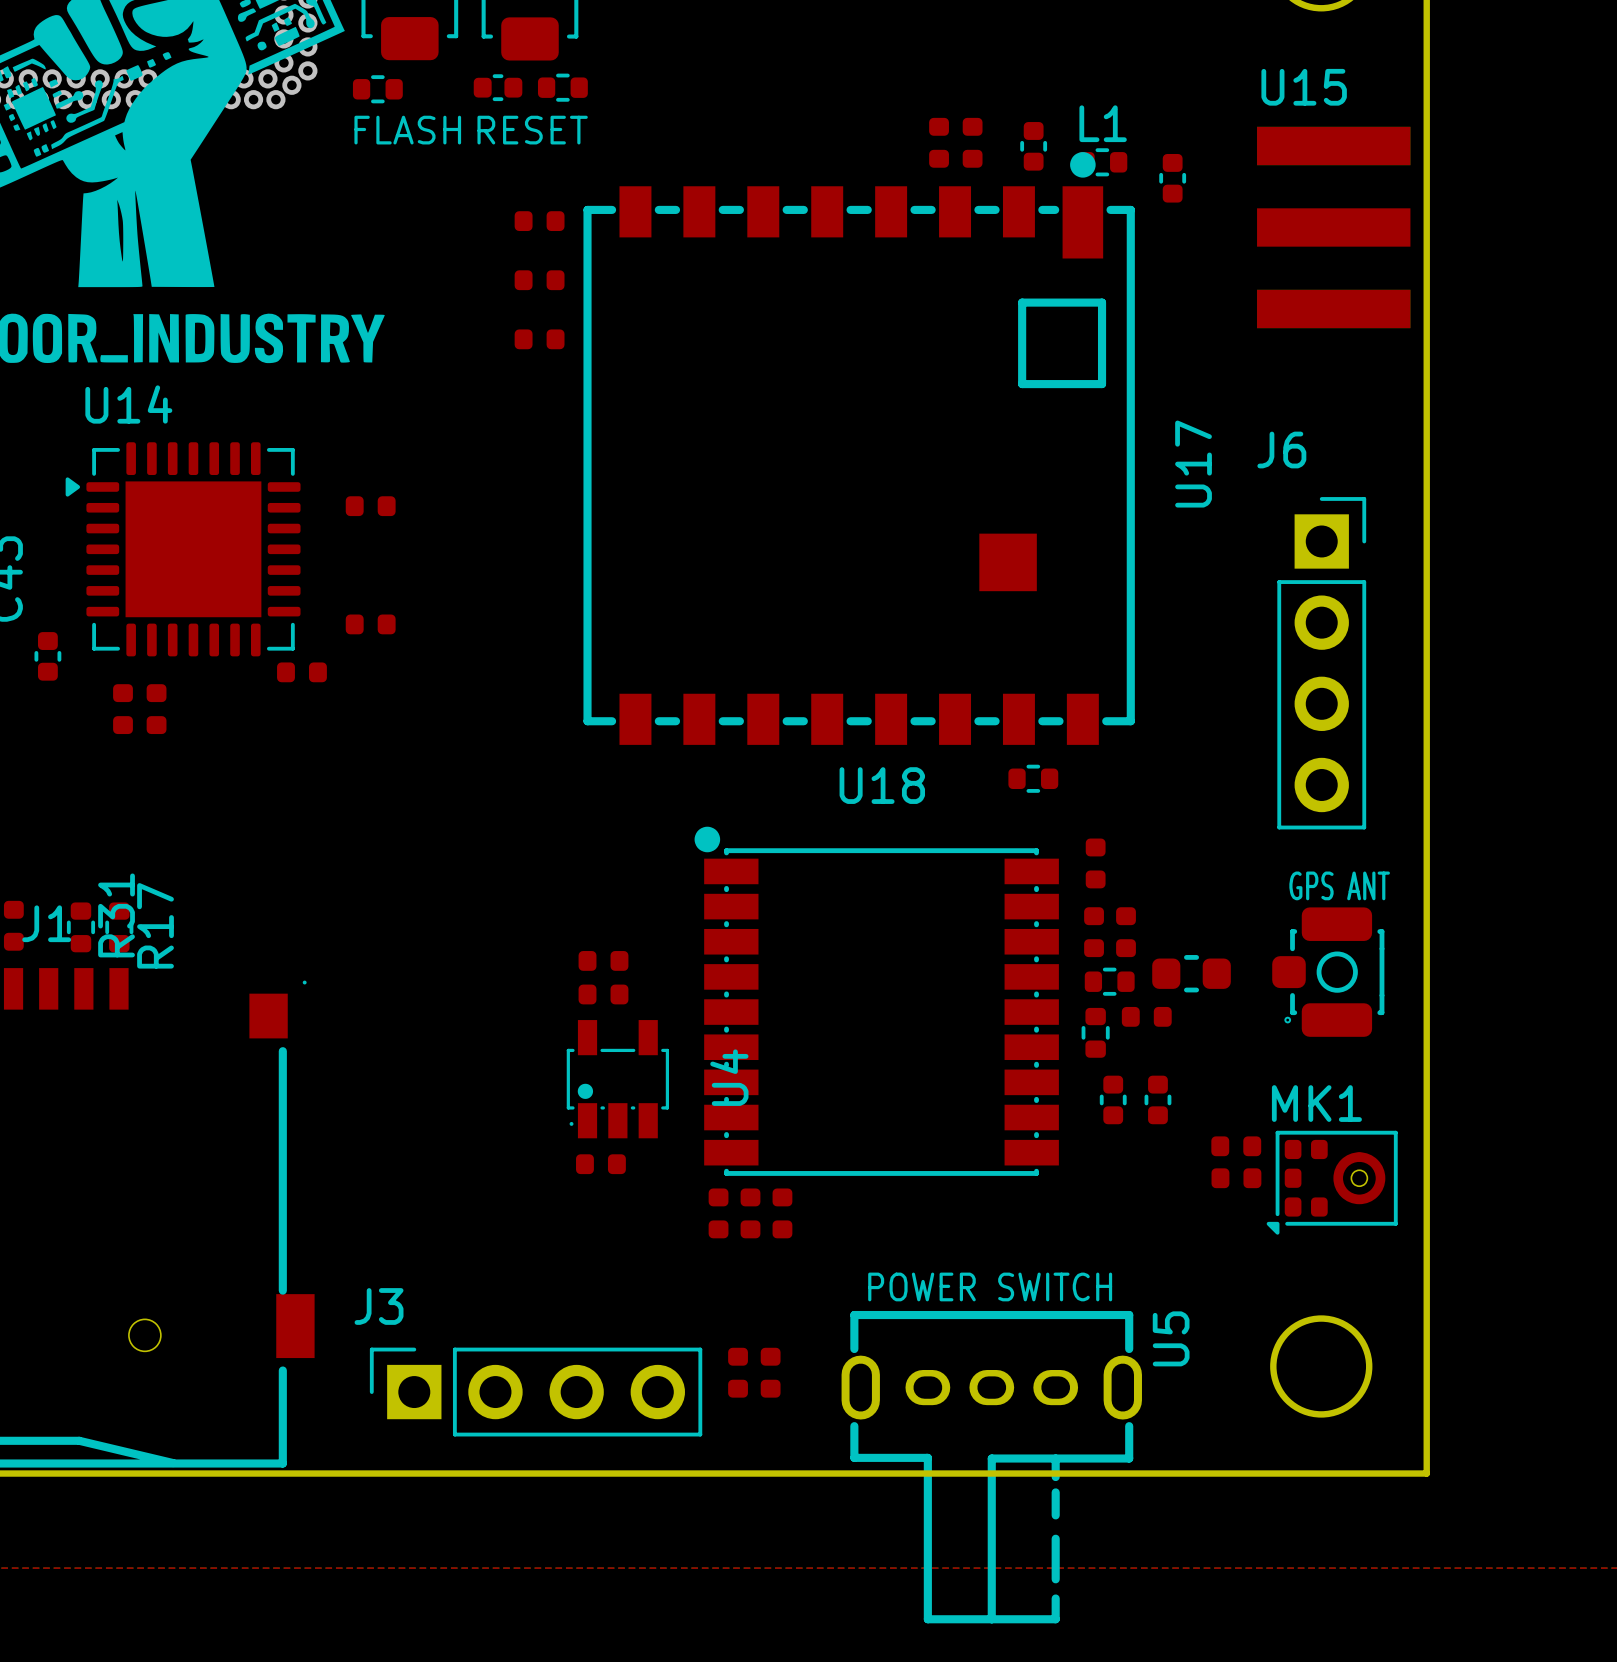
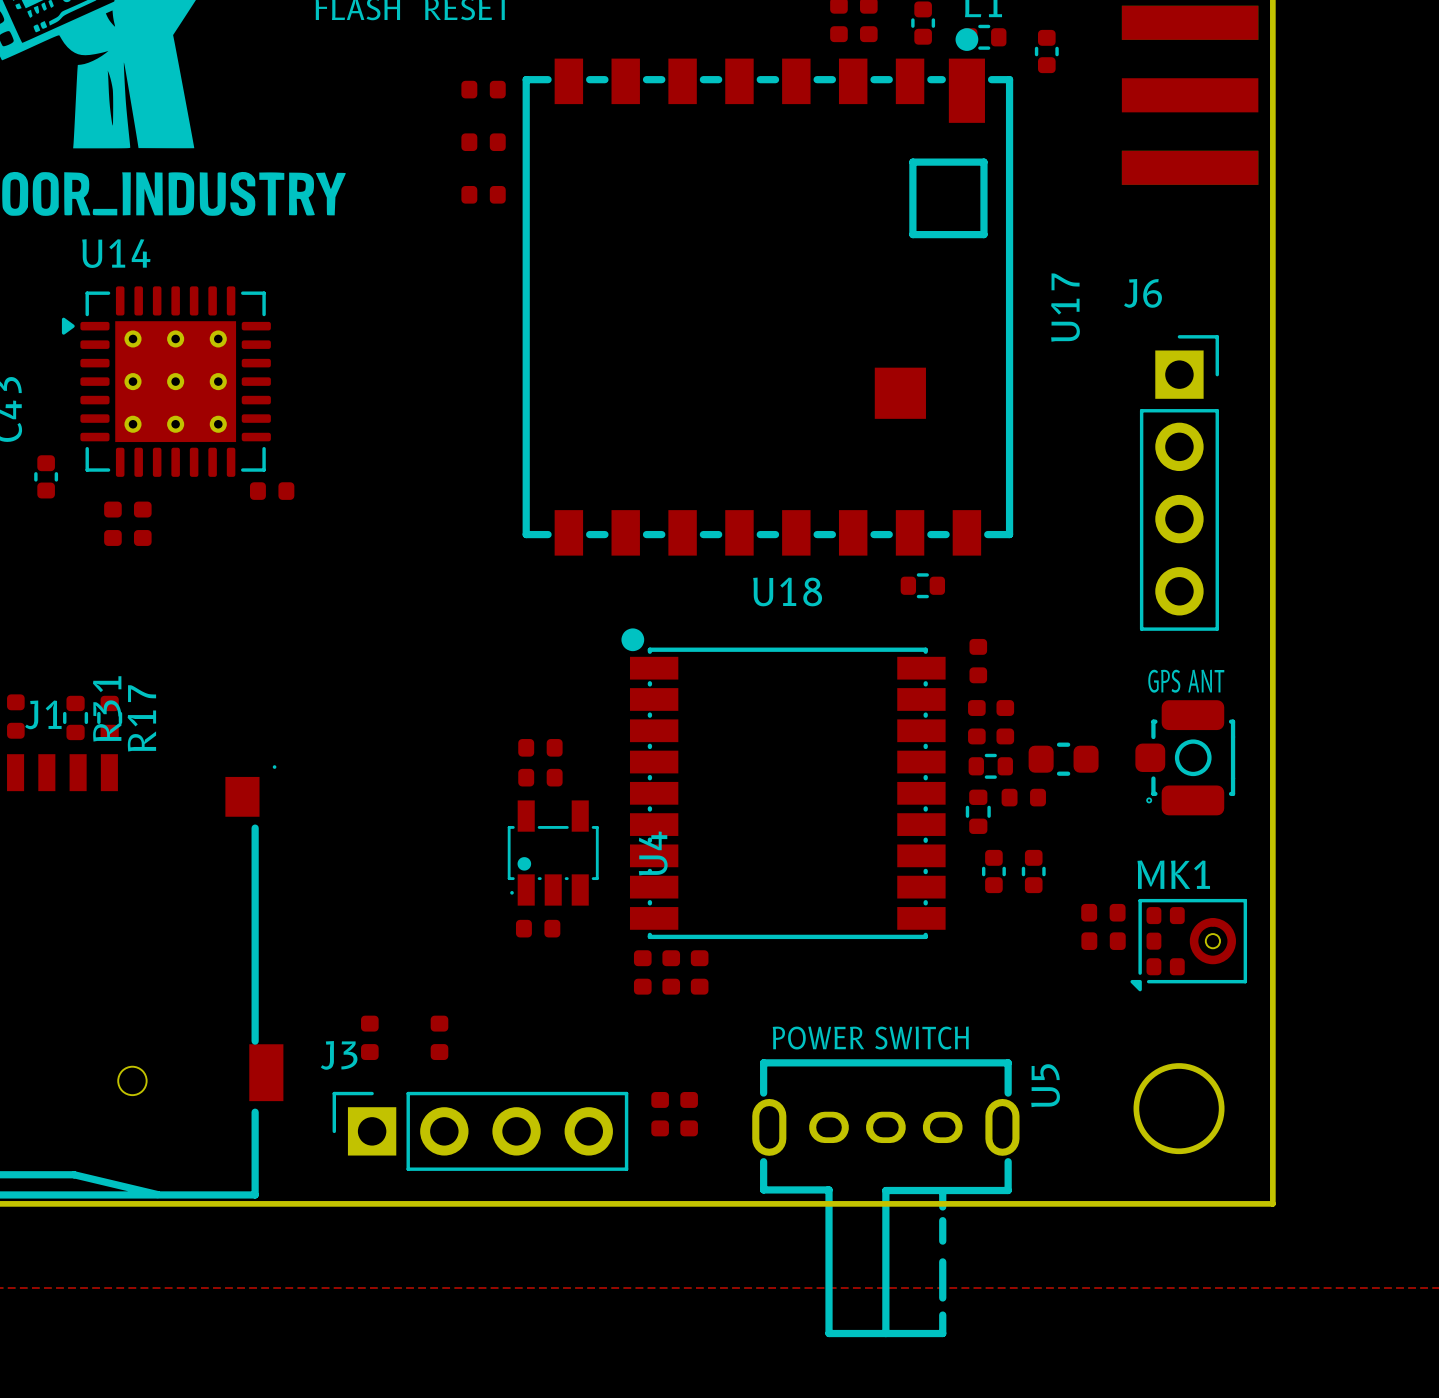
U14 footprint: [65, 442, 301, 657] -> [61, 286, 271, 477]
part: (370, 506) -> none
part: (370, 624) -> none
part: none -> (369, 1037)
part: none -> (439, 1037)

